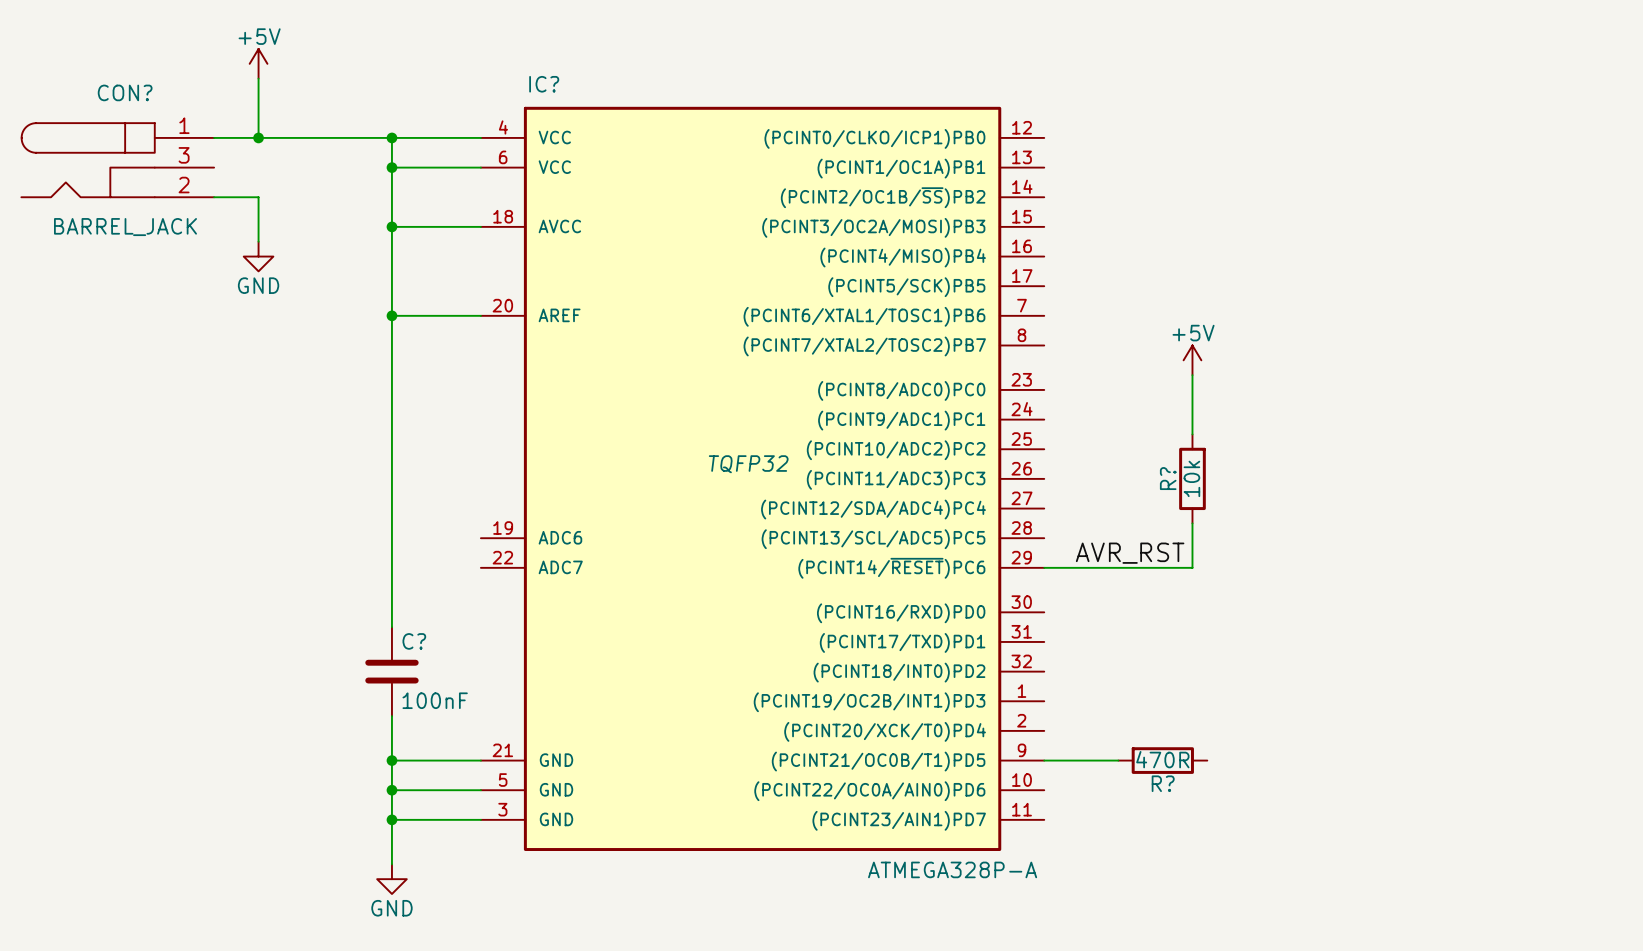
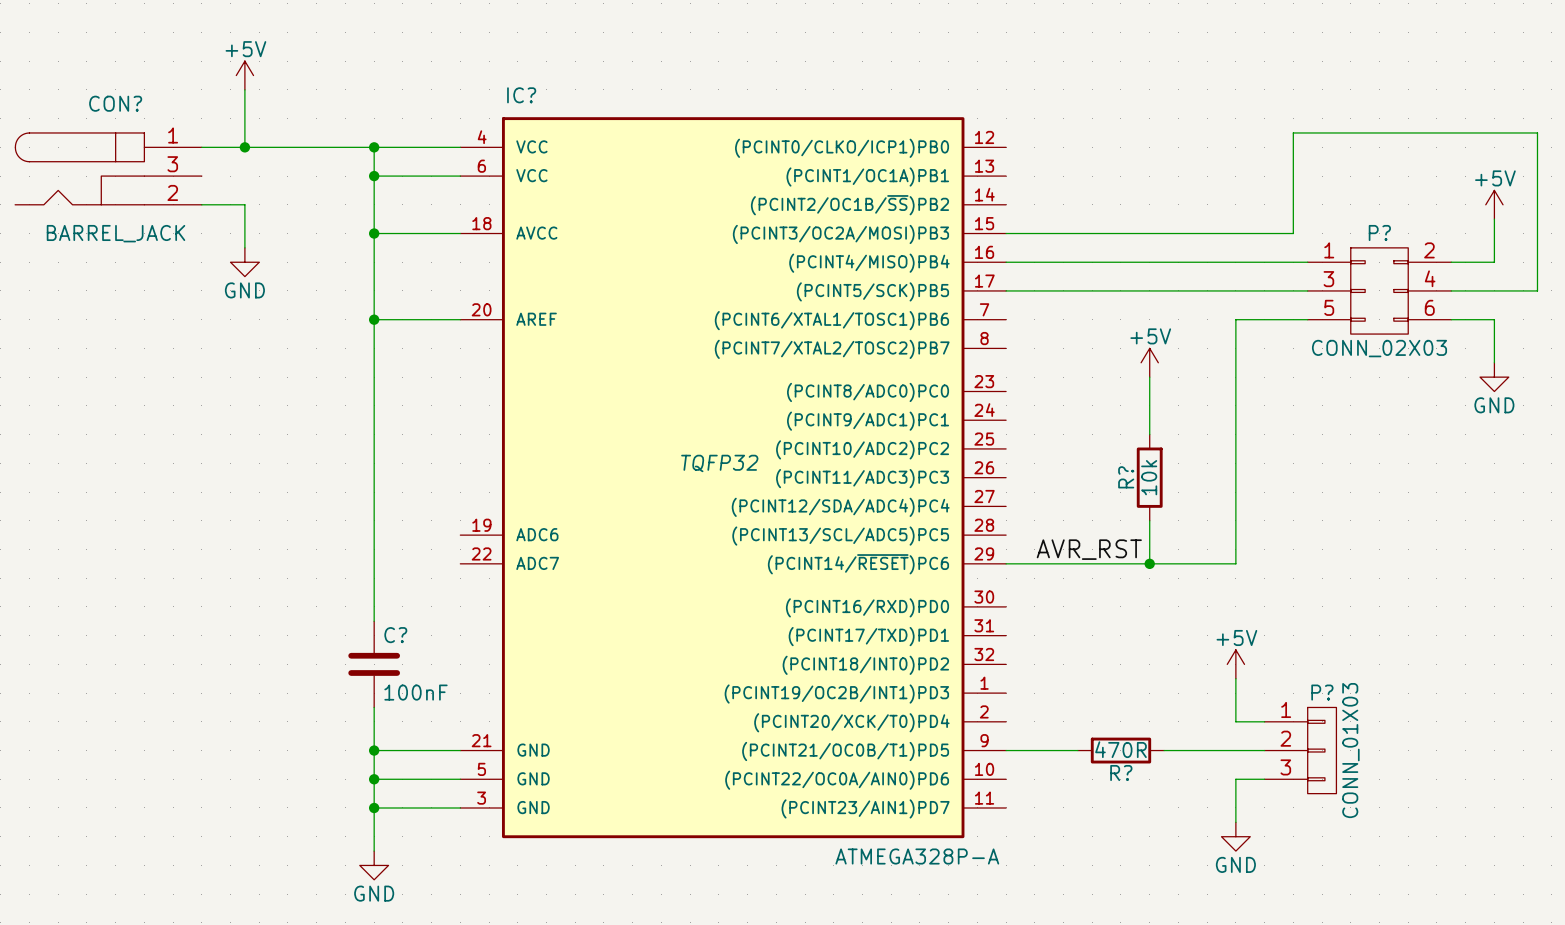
power symbol: none -> +5V (1494, 204)
wire: none -> (1494, 219) (1494, 262) (1451, 262)
wire: none -> (1006, 233) (1293, 233) (1293, 132) (1537, 132) (1537, 290) (1451, 290)
wire: none -> (1006, 262) (1307, 262)
wire: none -> (1006, 290) (1307, 290)
P?: none -> CONN_02X03 (1379, 290)
wire: none -> (1307, 319) (1235, 319) (1235, 563) (1149, 563)
wire: none -> (1451, 319) (1494, 319) (1494, 362)
power symbol: none -> GND (1494, 377)
junction: none -> (1149, 563)
power symbol: none -> +5V (1235, 664)
wire: none -> (1235, 678) (1235, 721) (1264, 721)
wire: none -> (1164, 750) (1264, 750)
P?: none -> CONN_01X03 (1300, 750)
wire: none -> (1264, 779) (1235, 779) (1235, 822)
power symbol: none -> GND (1235, 836)

